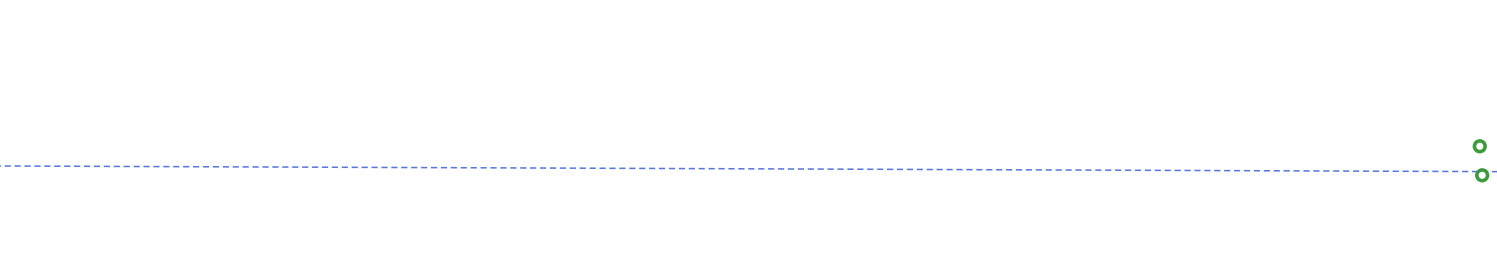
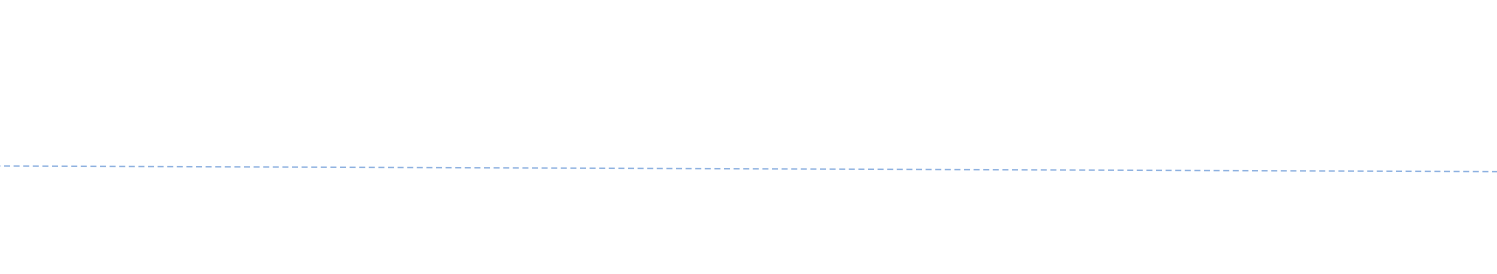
via: (1479, 146) -> none
via: (1482, 175) -> none

